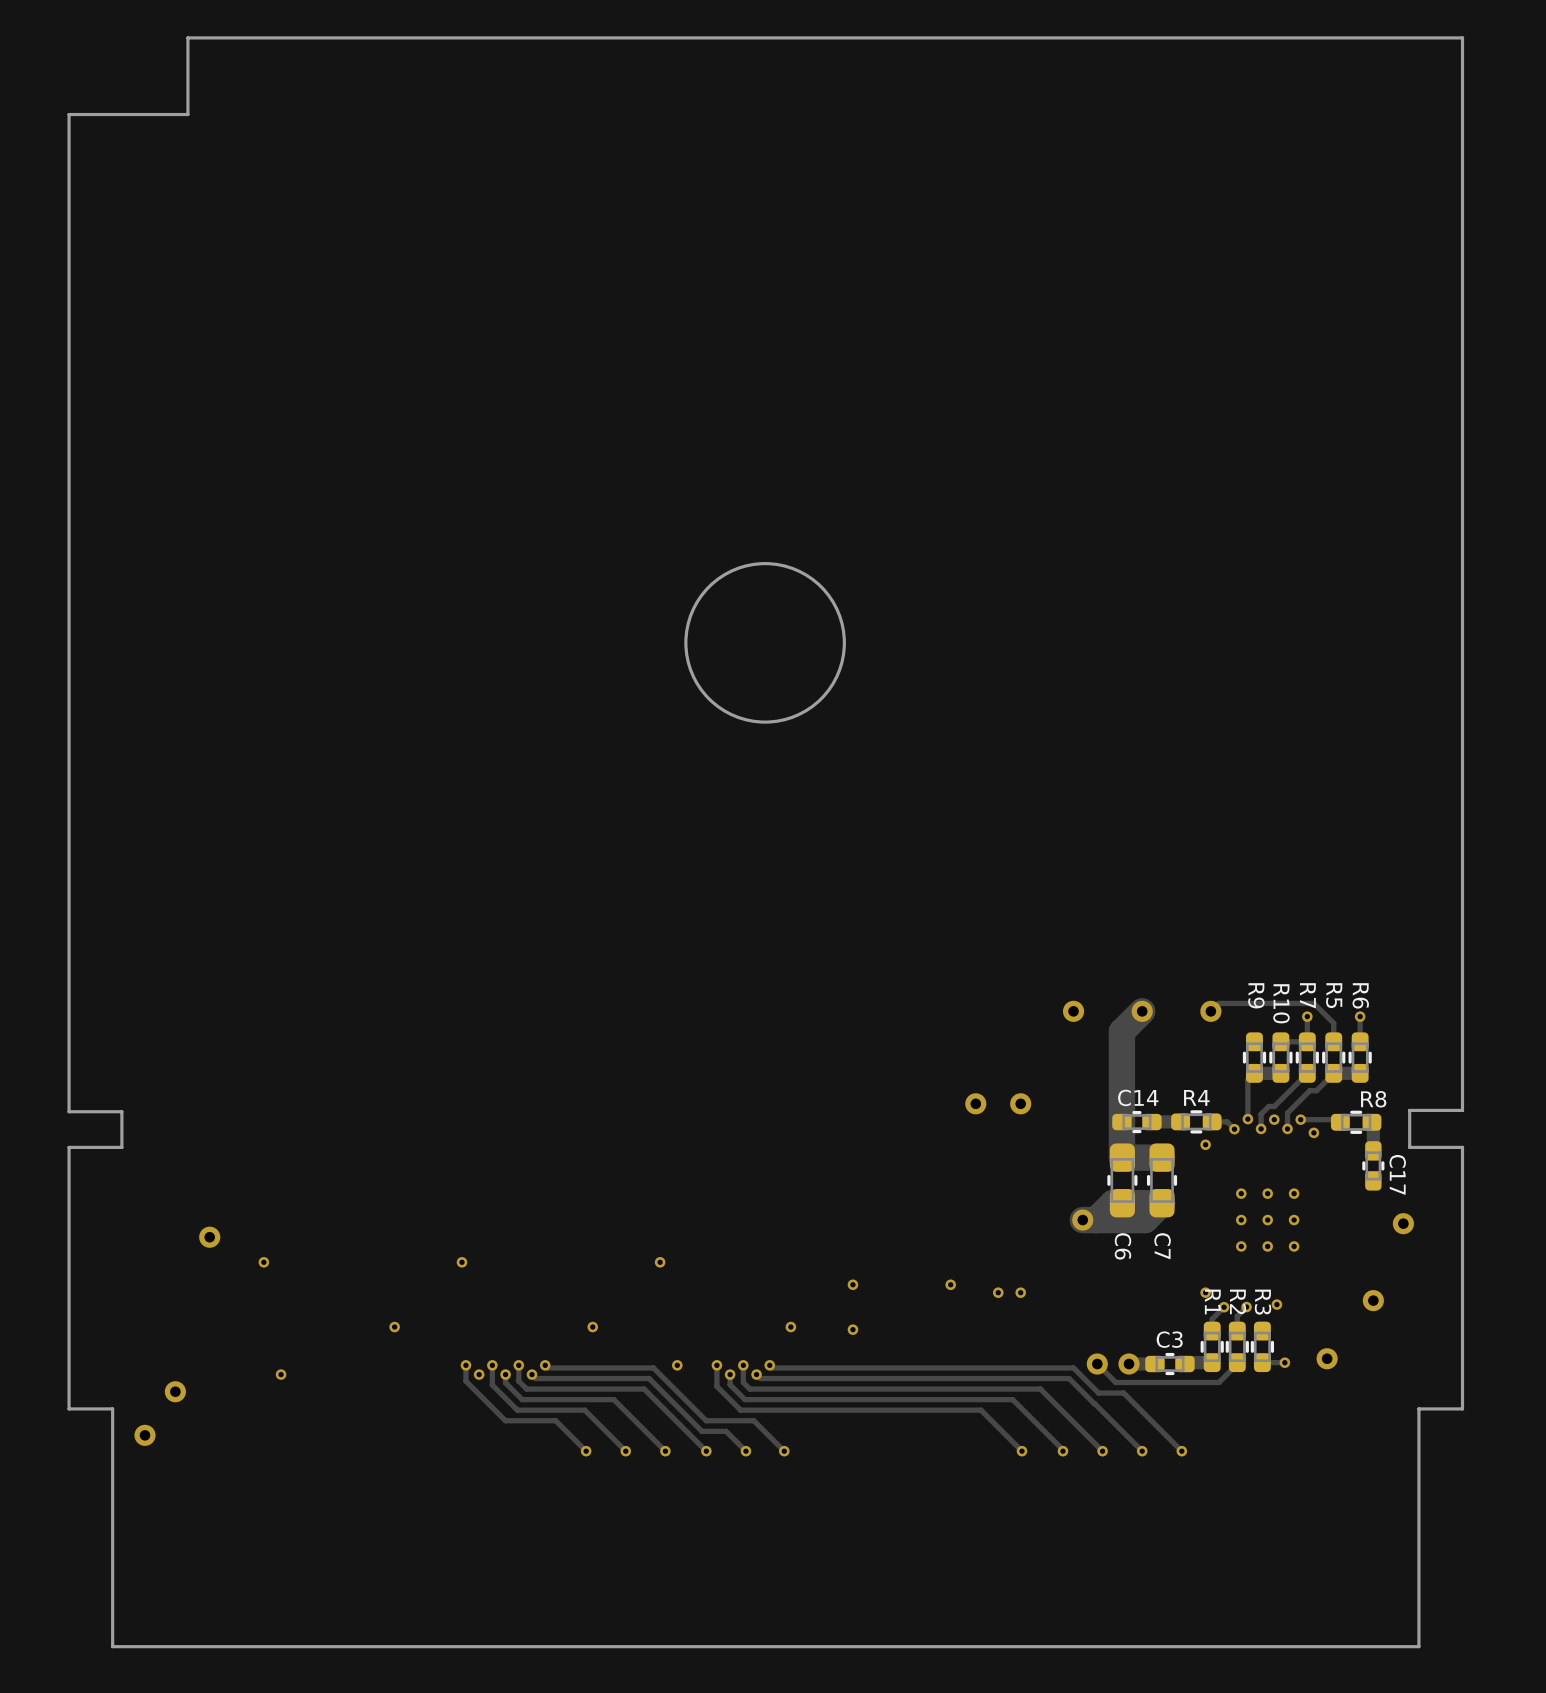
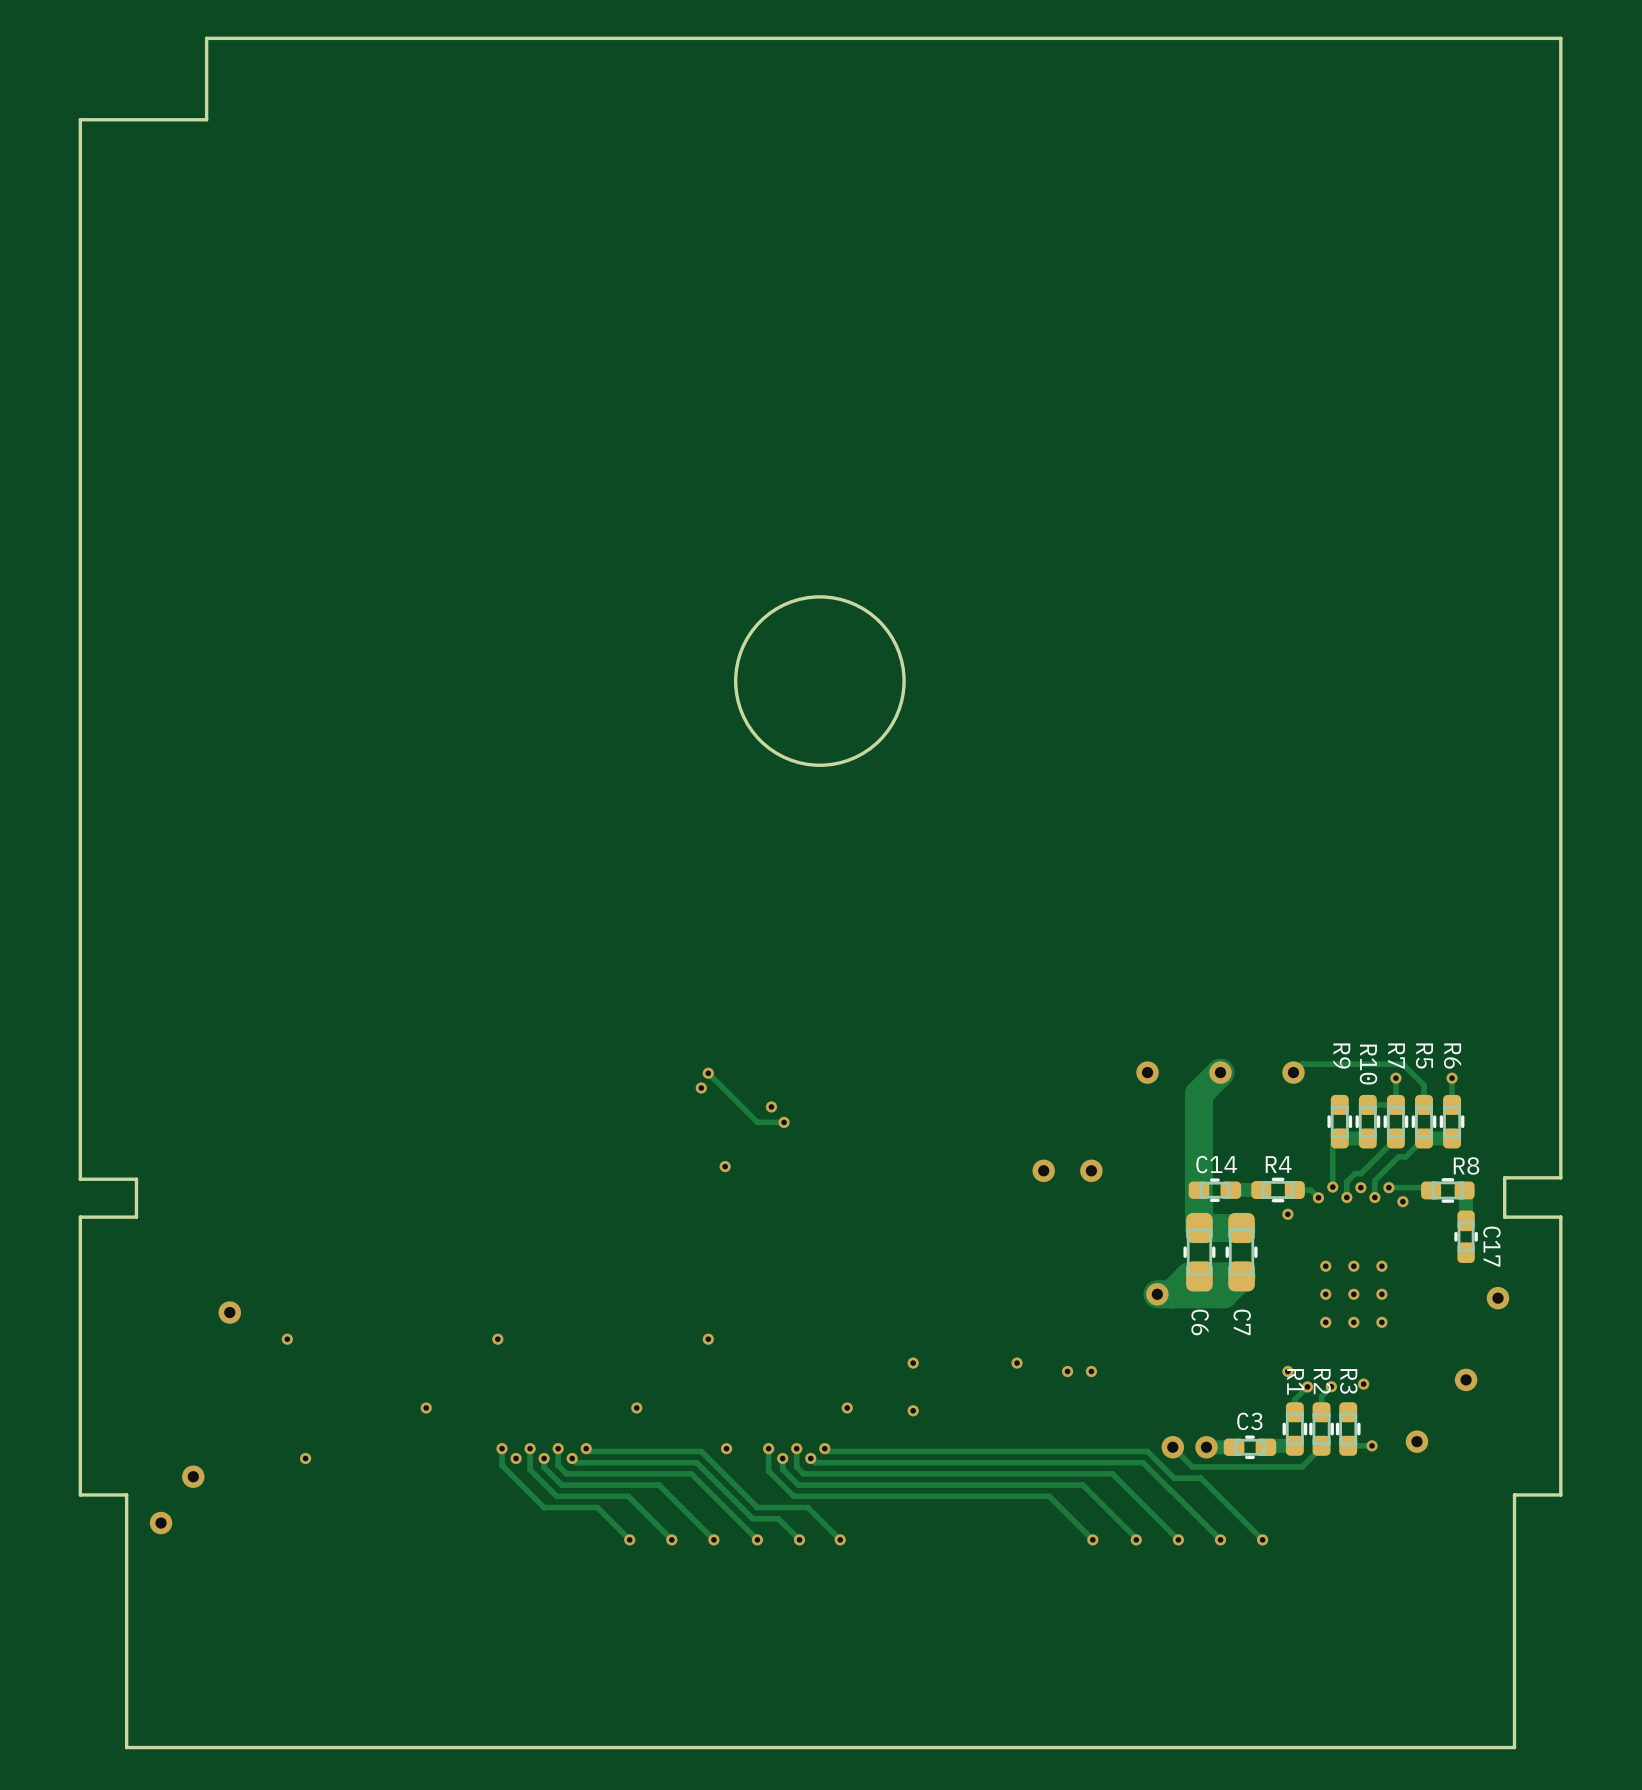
track: none -> (708, 1073) (757, 1122) (784, 1122)
via: none -> (708, 1073)
via: none -> (701, 1088)
via: none -> (771, 1106)
via: none -> (784, 1122)
via: none -> (725, 1166)

